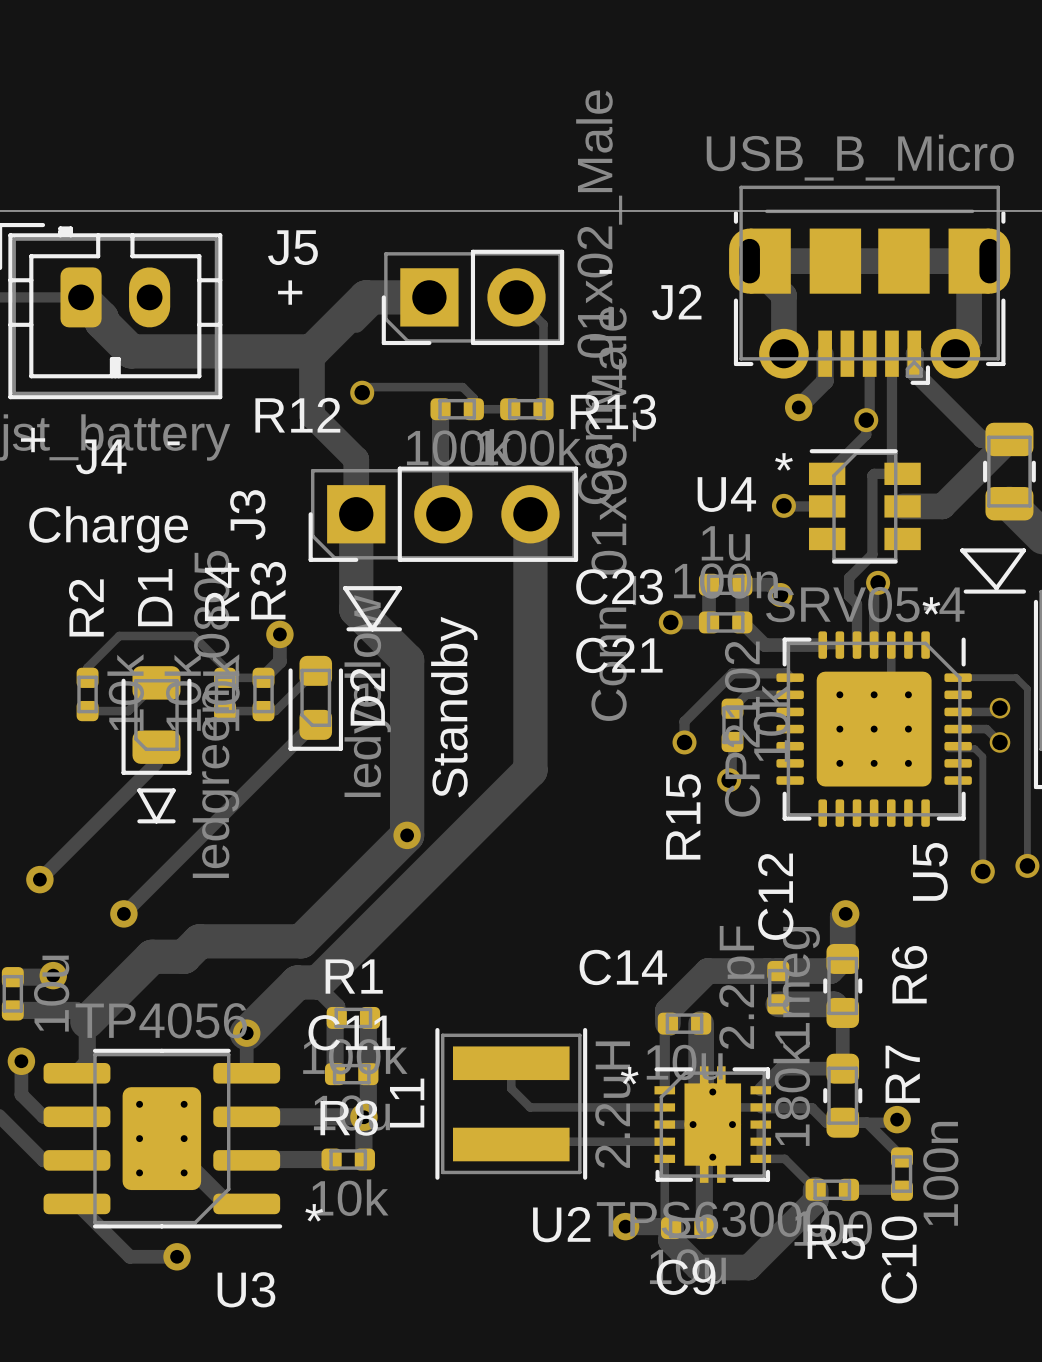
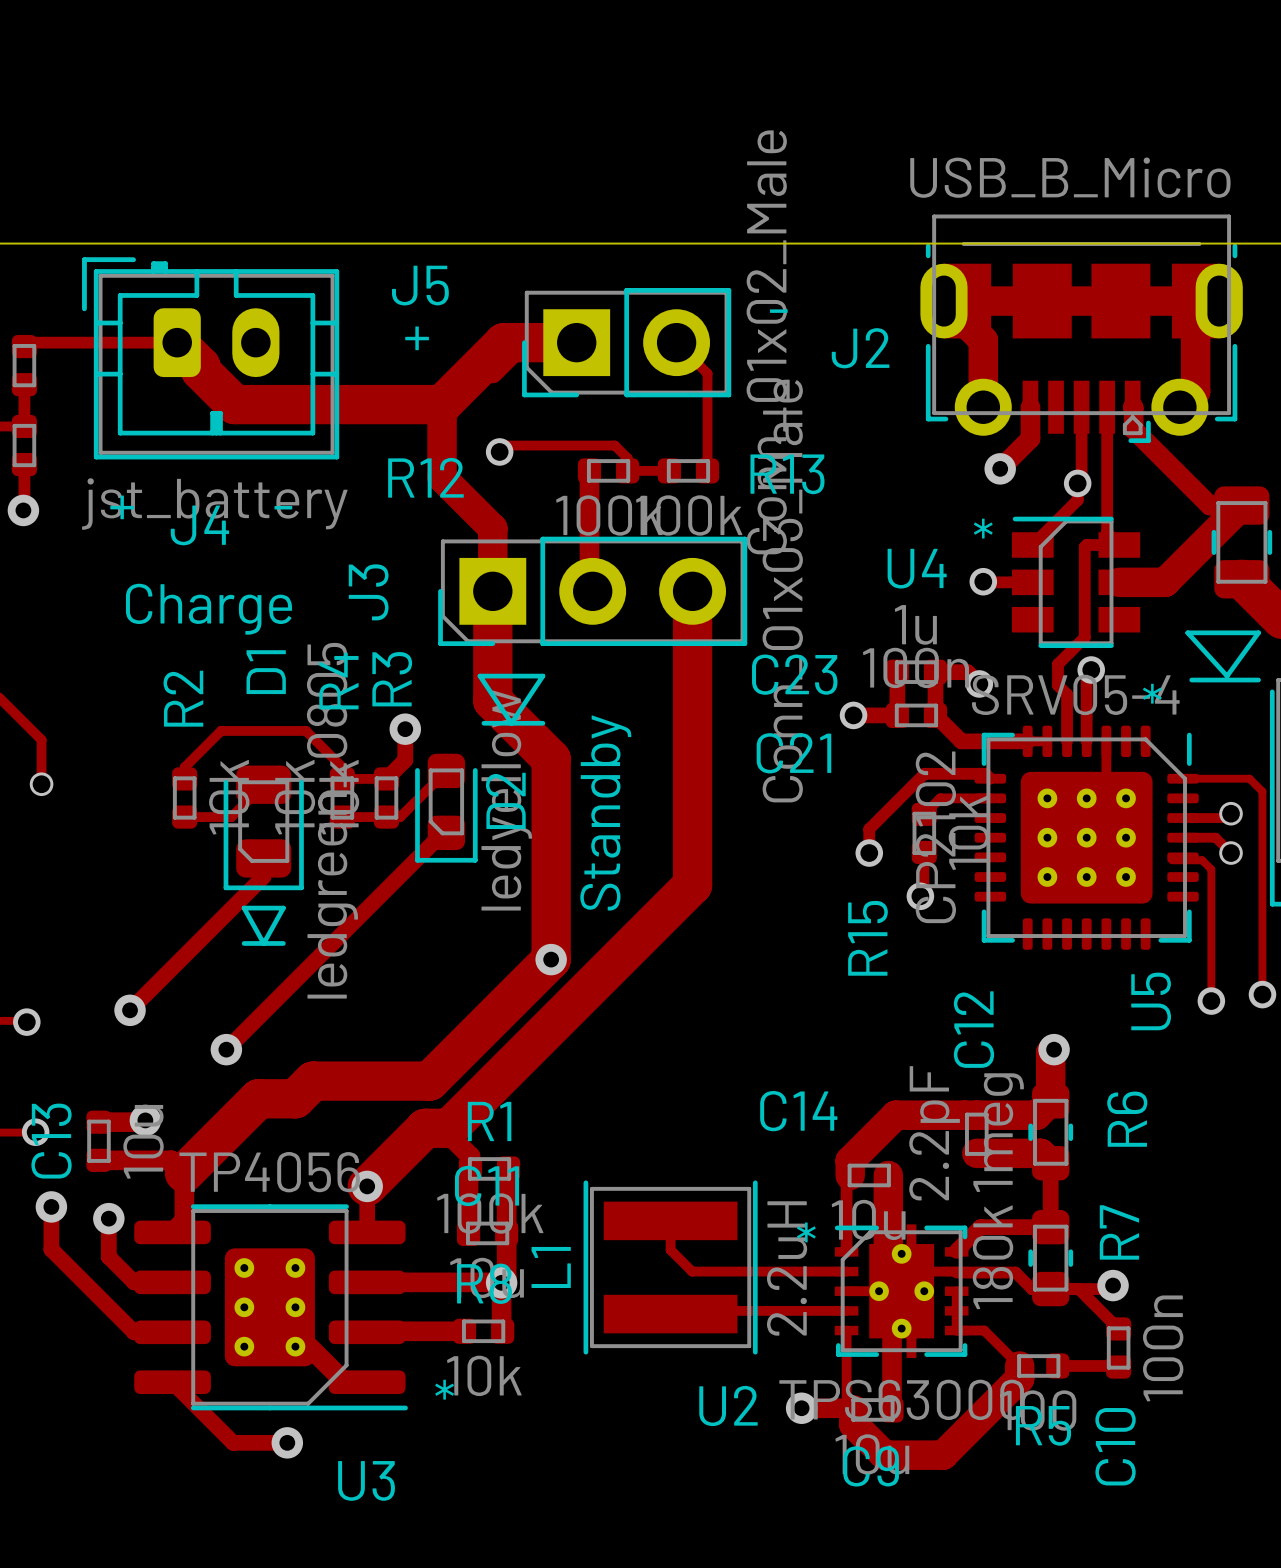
D1 name position: D1 (155, 597) -> D1 (266, 672)

